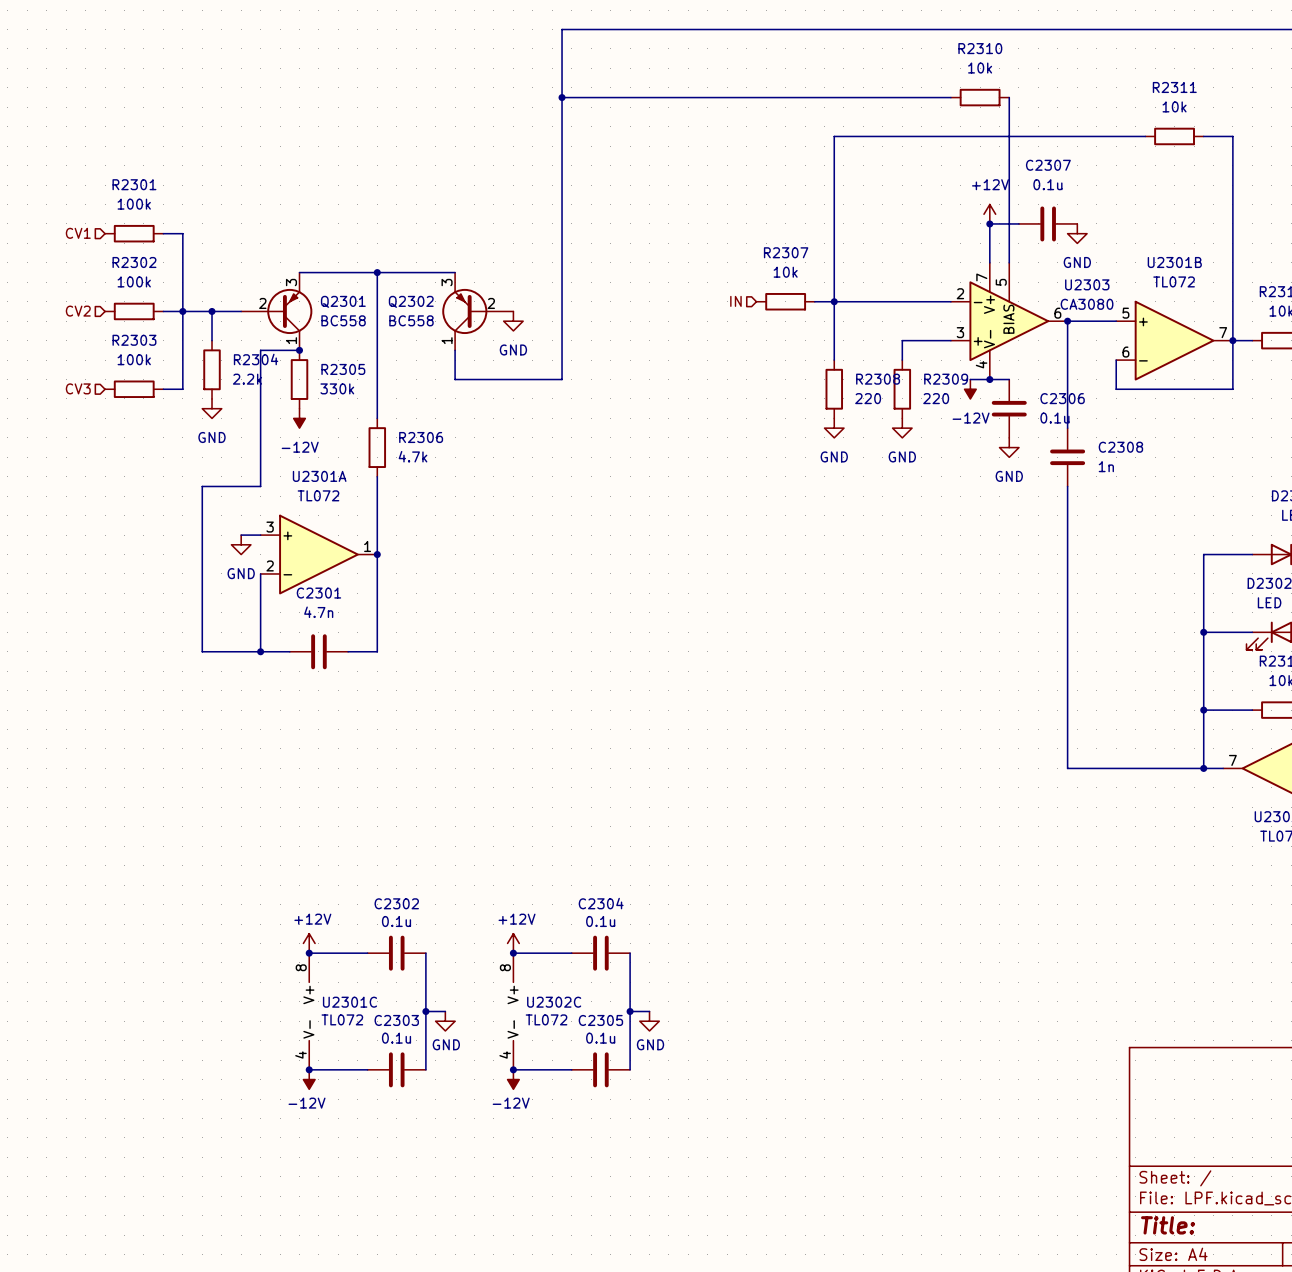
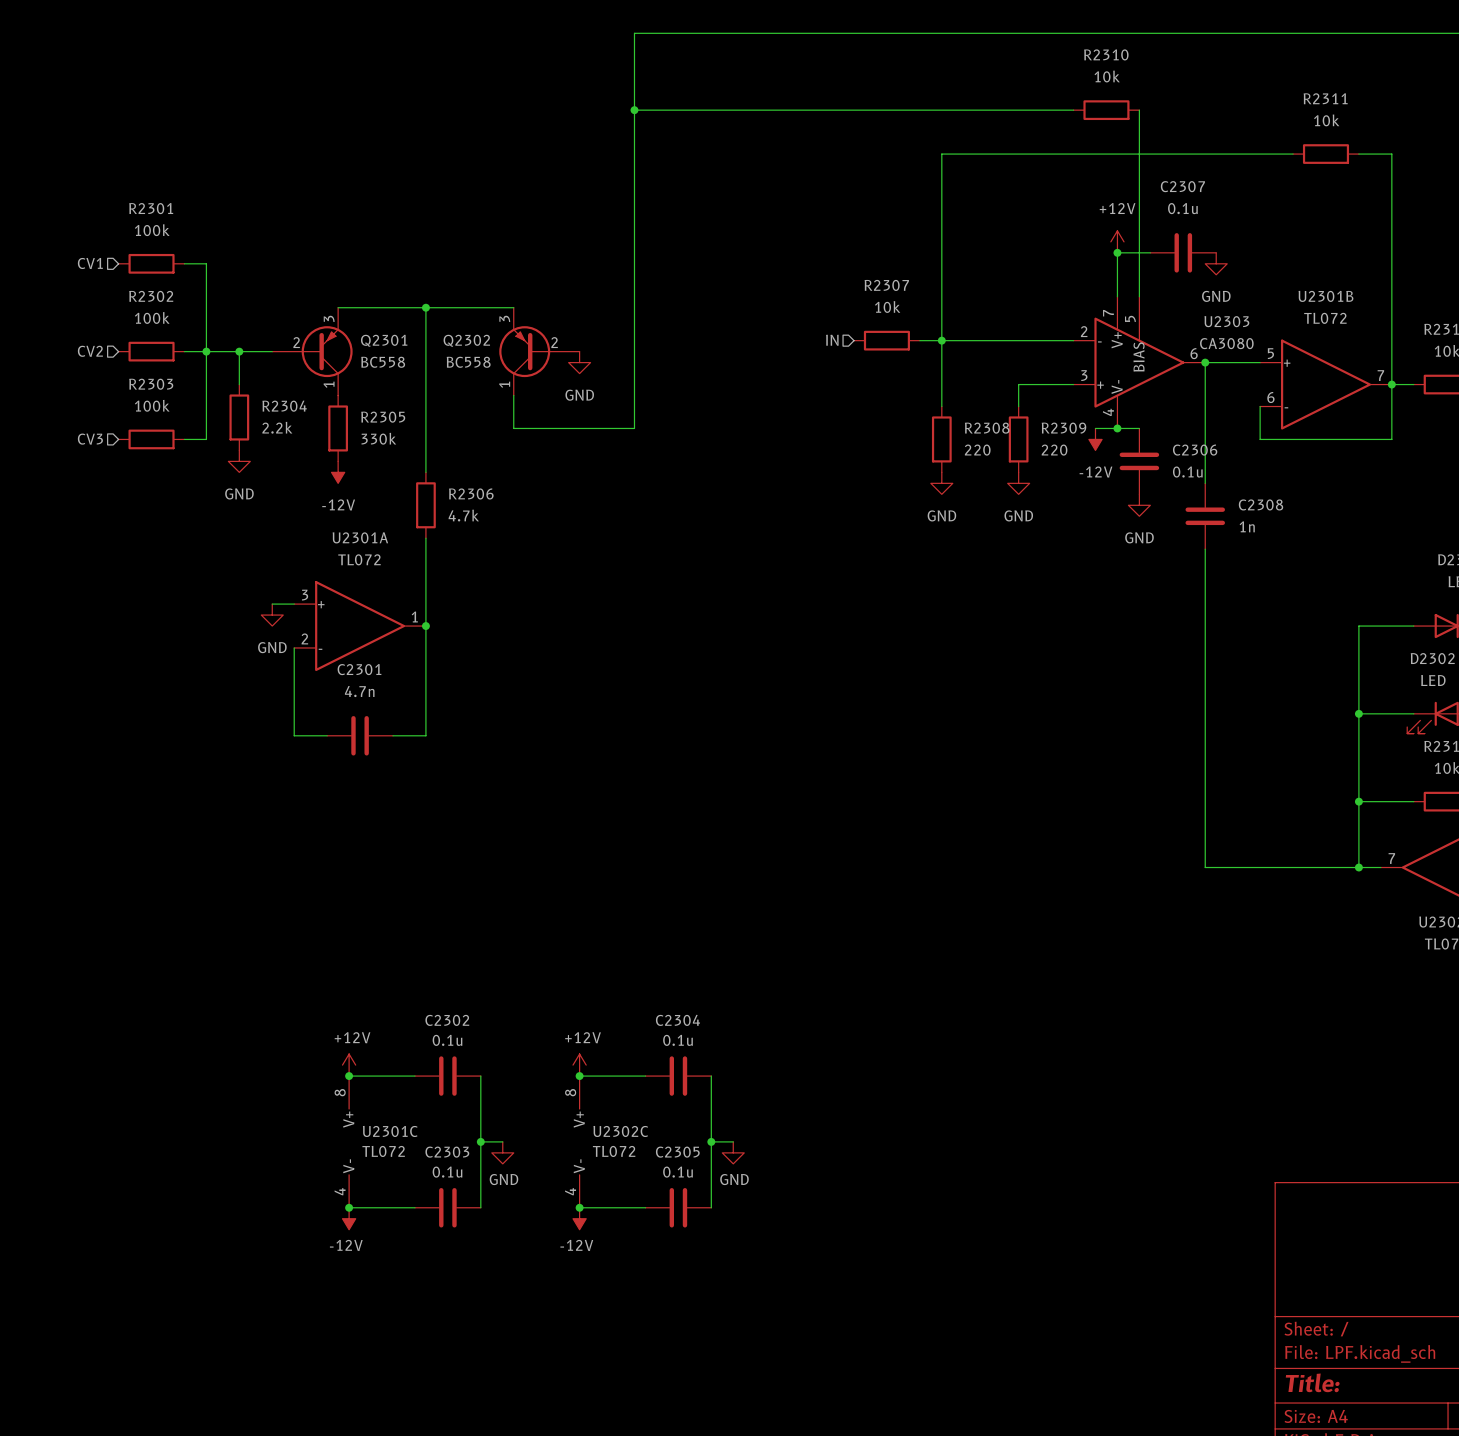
wire: (299, 350) (260, 350) (260, 486) (202, 486) (202, 651) (260, 651) -> none
junction: (299, 350) -> none
junction: (260, 651) -> none

